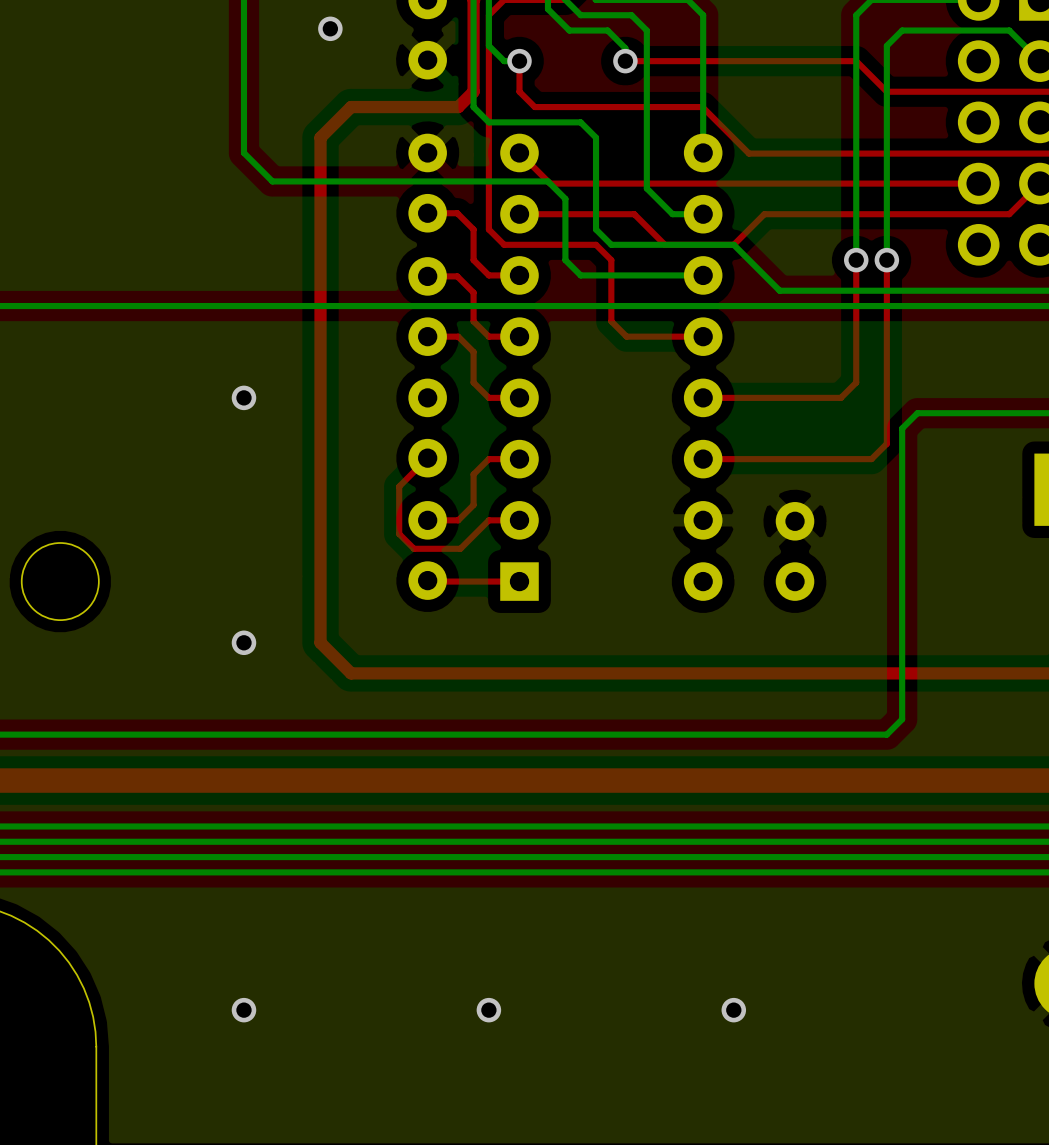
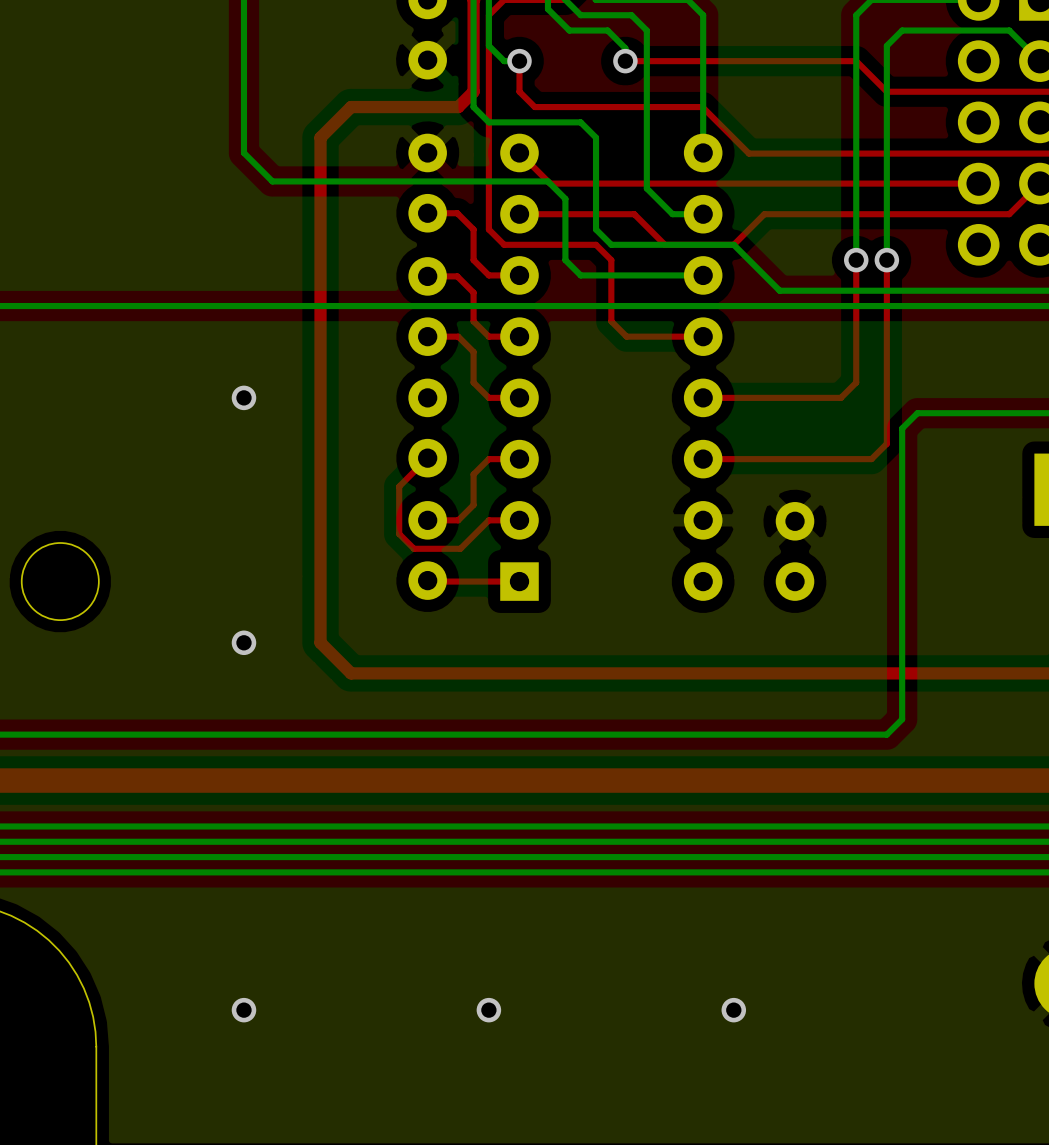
via: (330, 28) -> none

